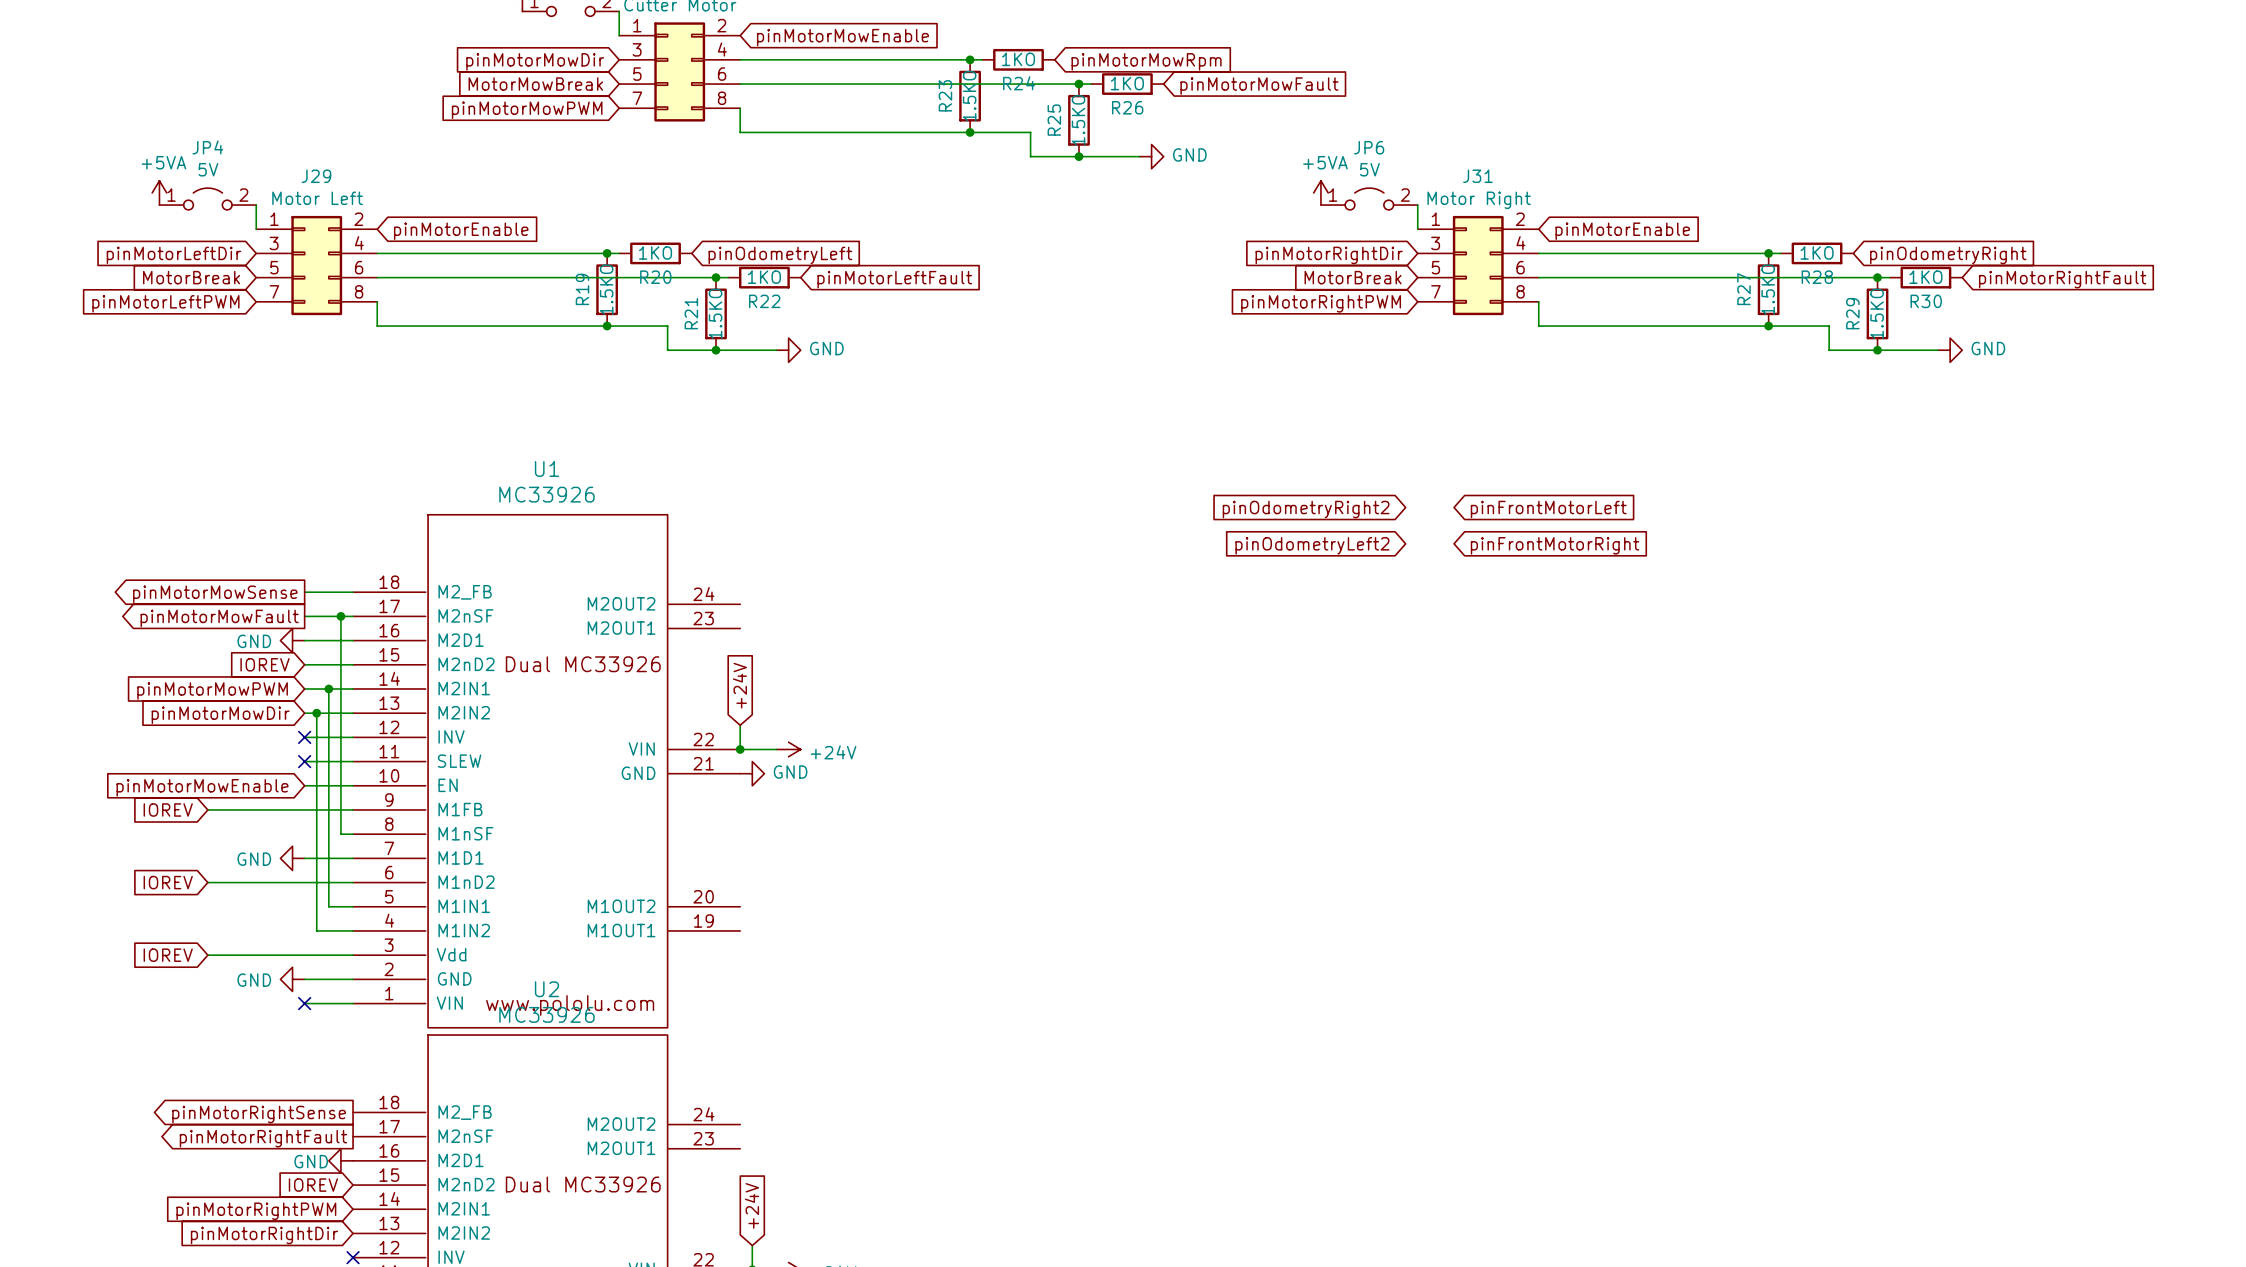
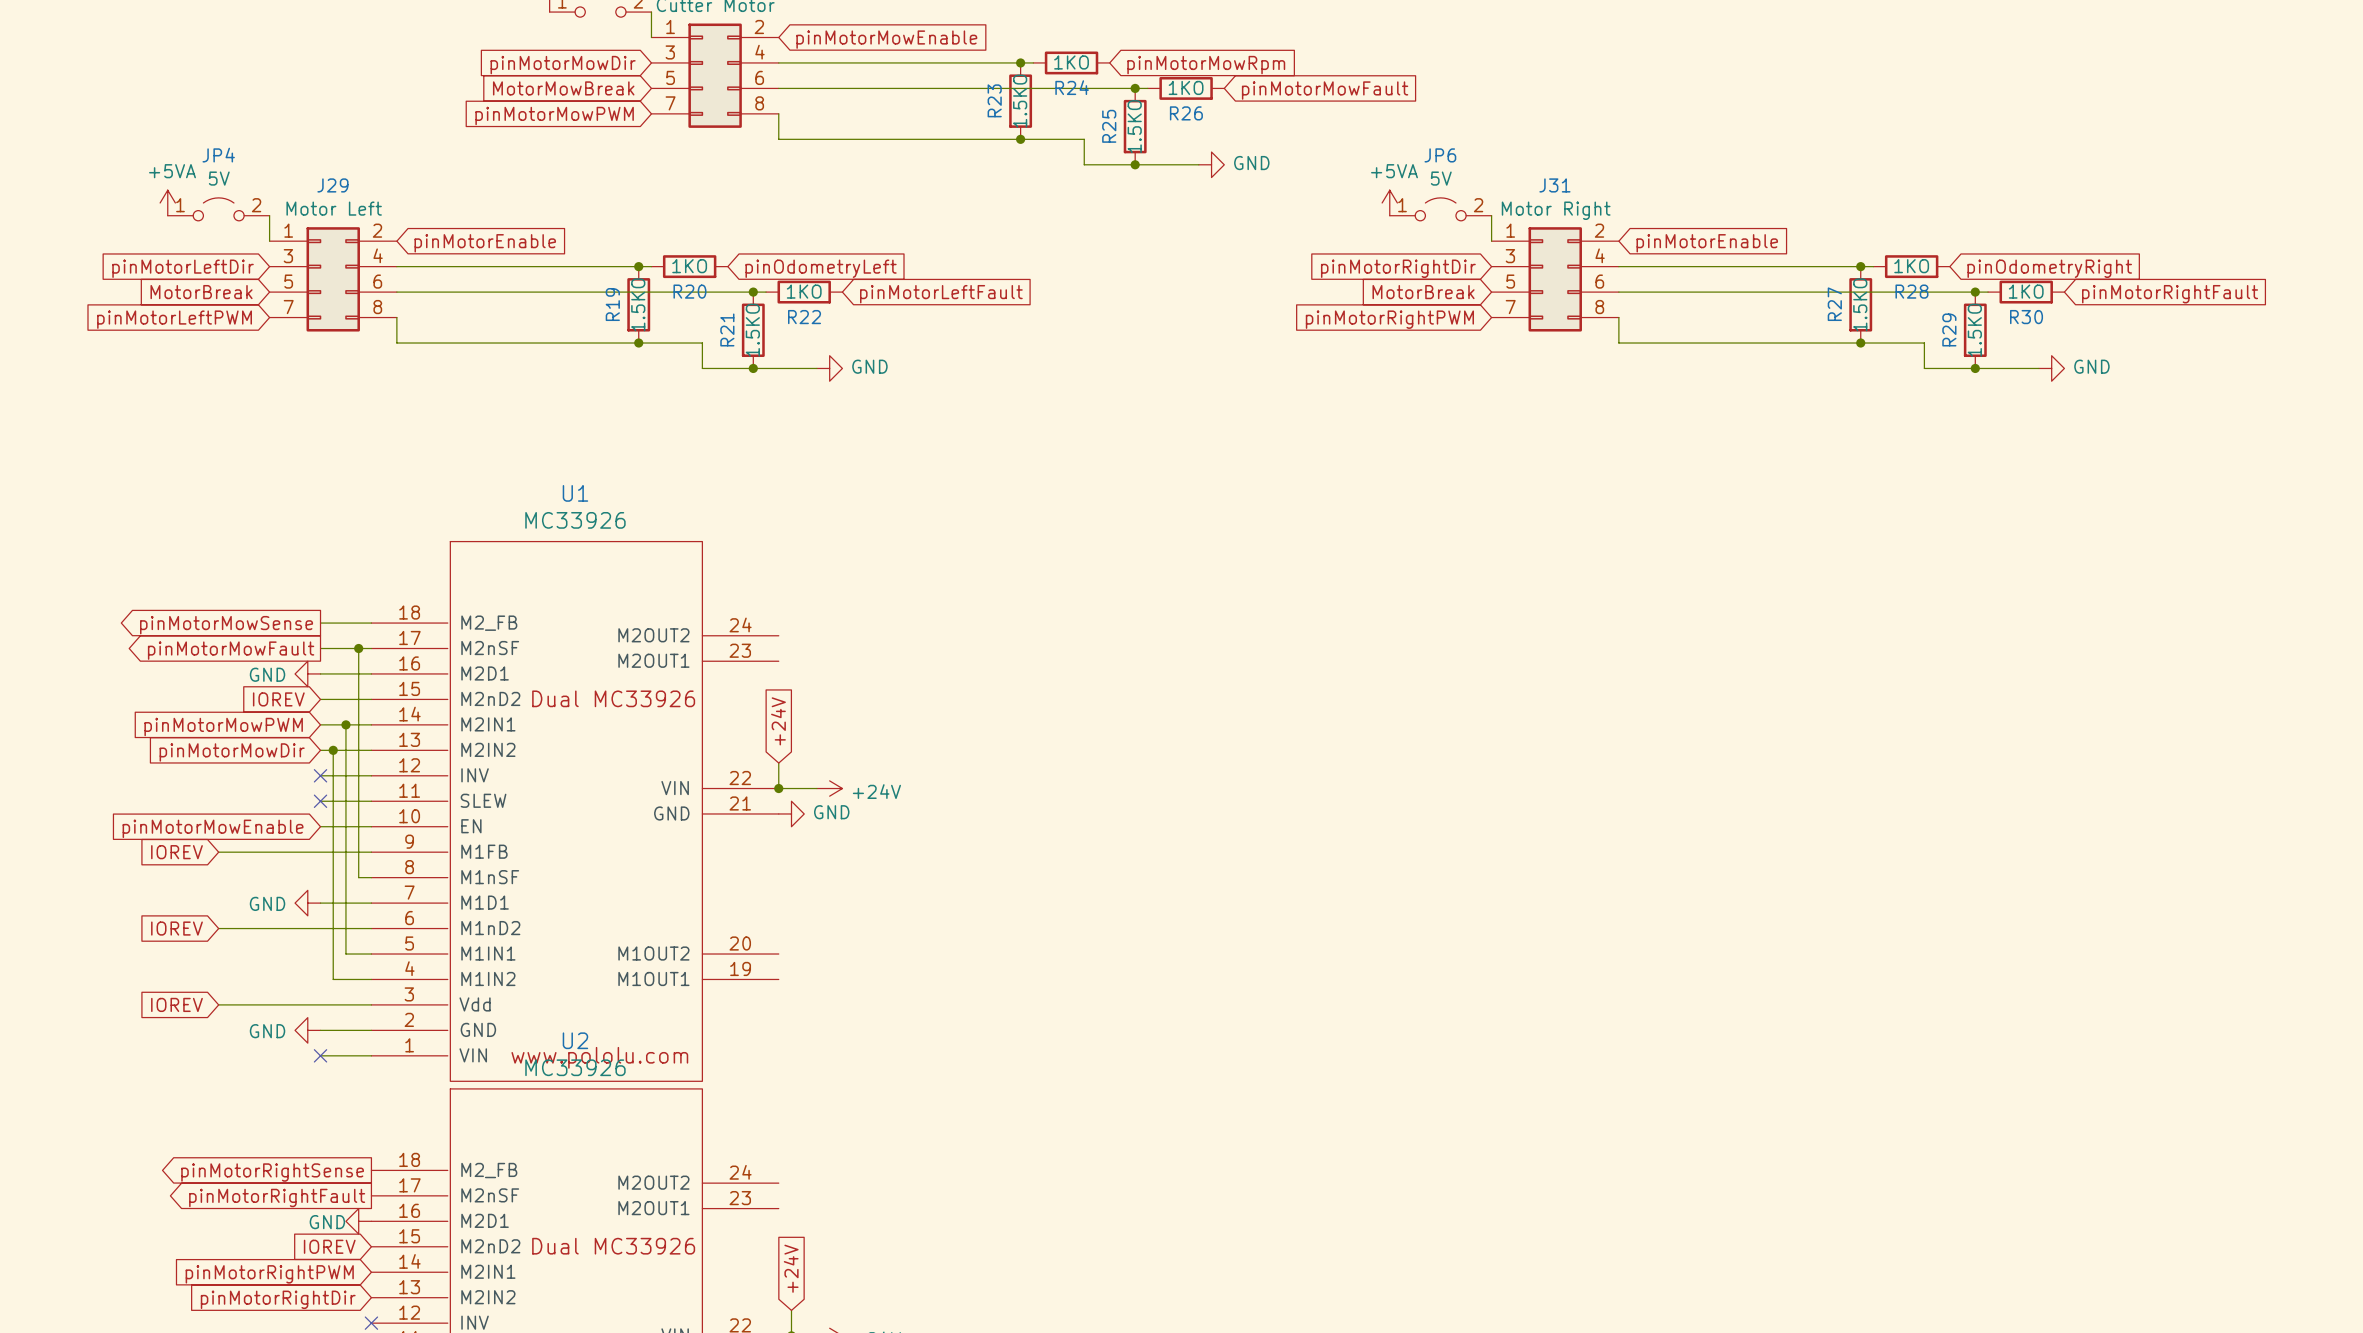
global label: pinOdometryRight2 (1306, 509) -> none
global label: pinFrontMotorLeft (1548, 509) -> none
global label: pinOdometryLeft2 (1312, 545) -> none
global label: pinFrontMotorRight (1555, 545) -> none

